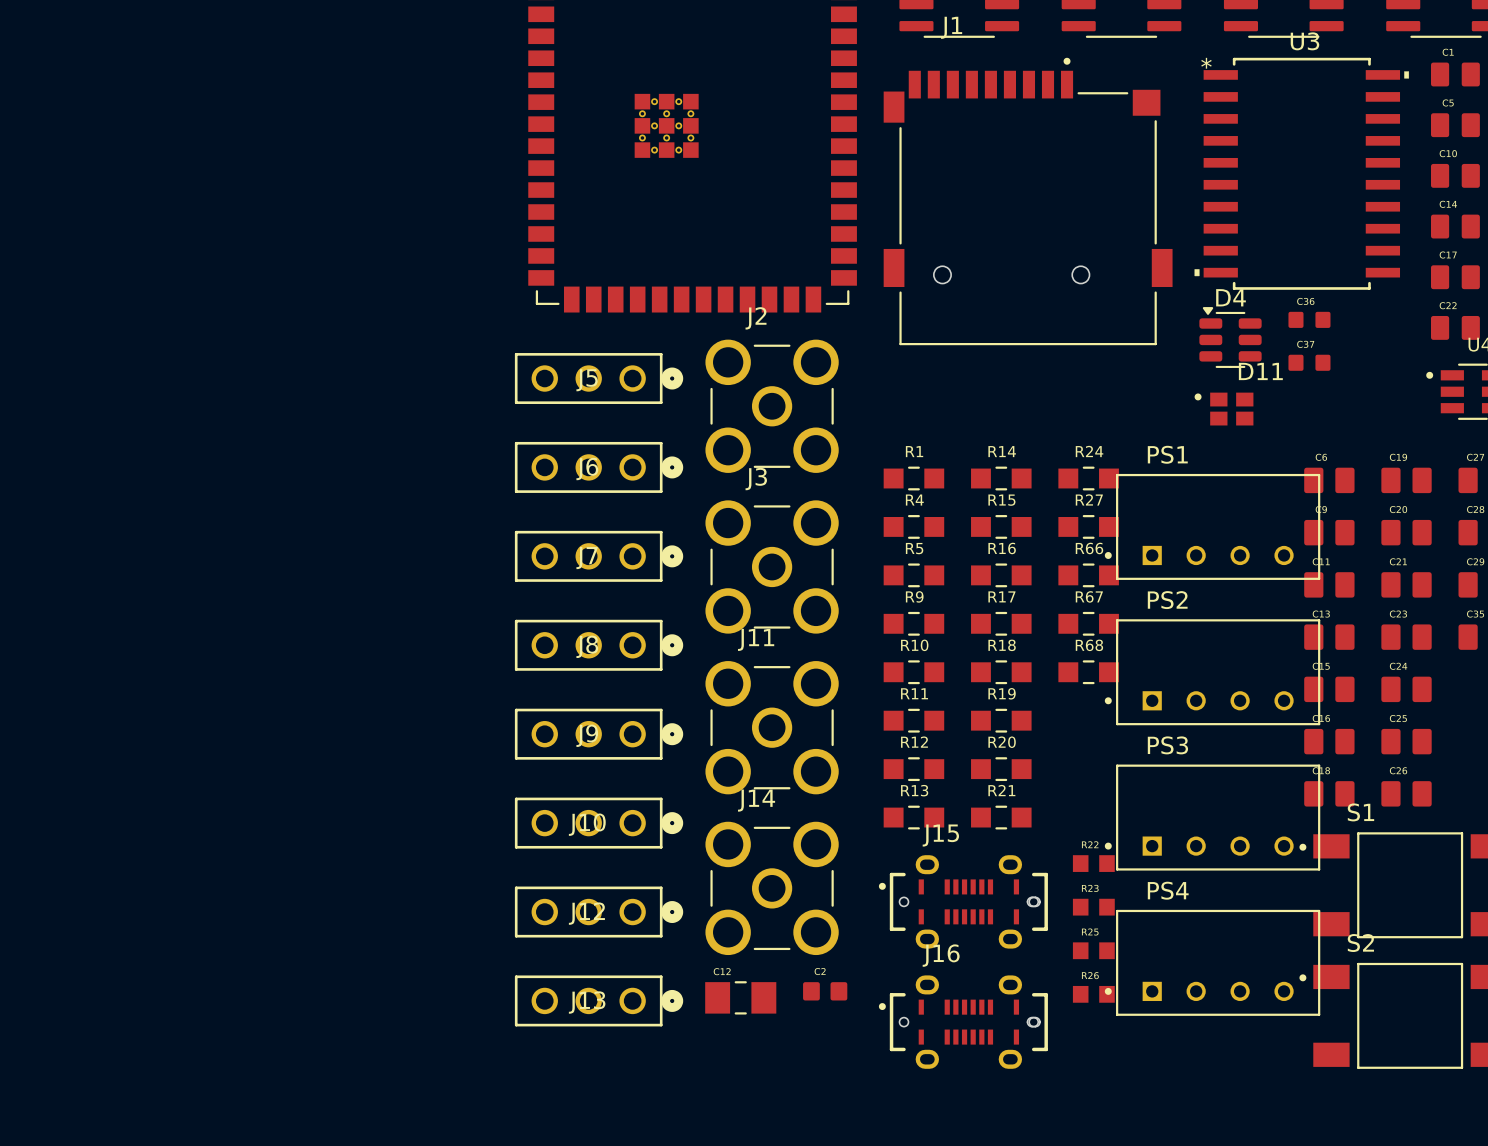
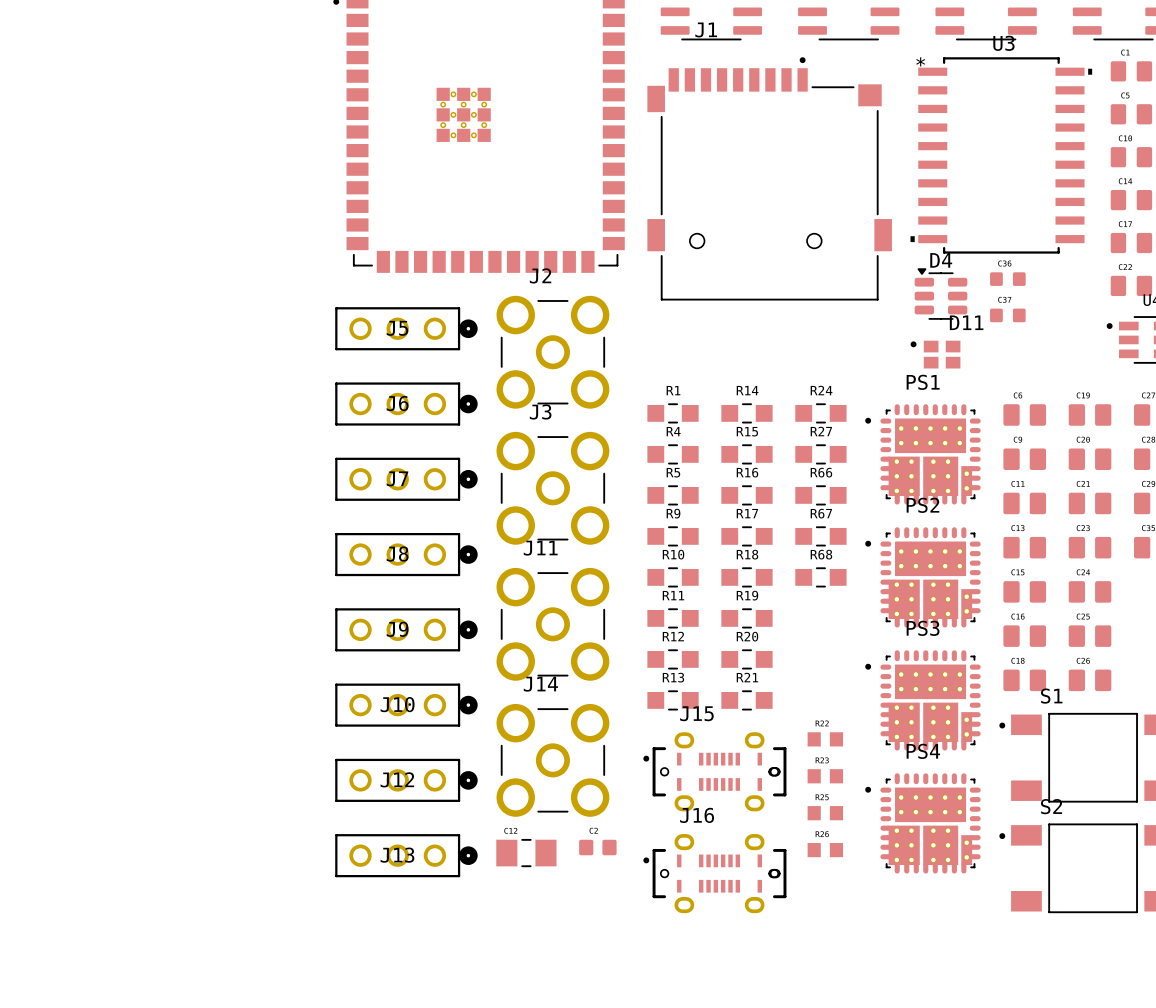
PS1 name position: PS1 (1167, 454) -> PS1 (923, 382)
PS1 footprint: [1104, 473, 1321, 580] -> [865, 404, 981, 505]
PS2 name position: PS2 (1167, 600) -> PS2 (922, 505)
PS2 footprint: [1104, 619, 1321, 726] -> [865, 527, 981, 628]
PS3 name position: PS3 (1167, 745) -> PS3 (923, 628)
PS3 footprint: [1104, 764, 1321, 871] -> [865, 650, 981, 751]
PS4 name position: PS4 (1168, 890) -> PS4 (923, 751)
PS4 footprint: [1104, 909, 1321, 1016] -> [865, 773, 981, 874]

